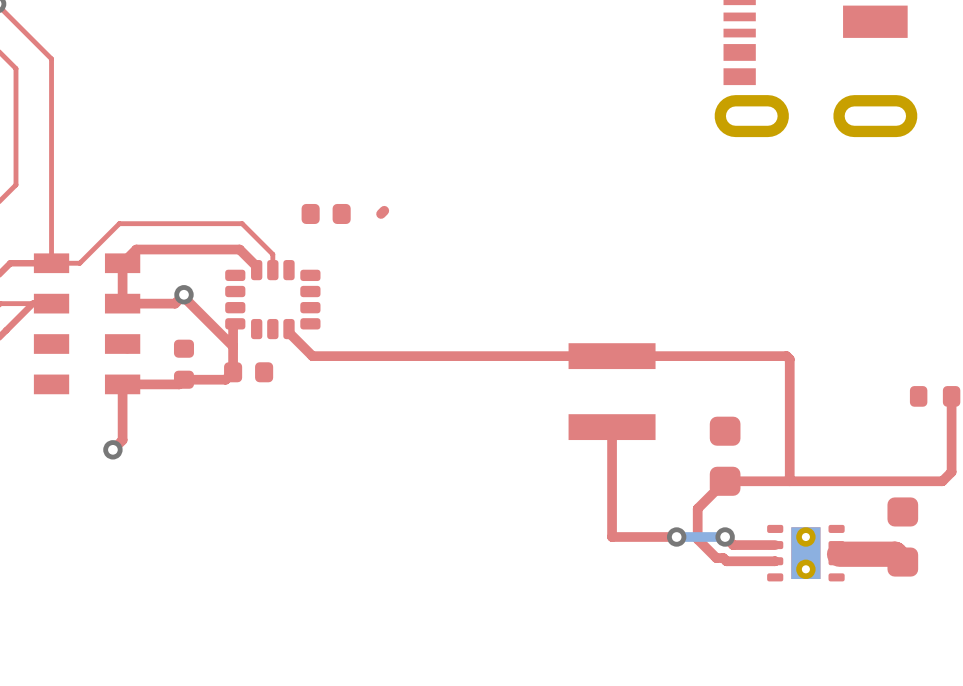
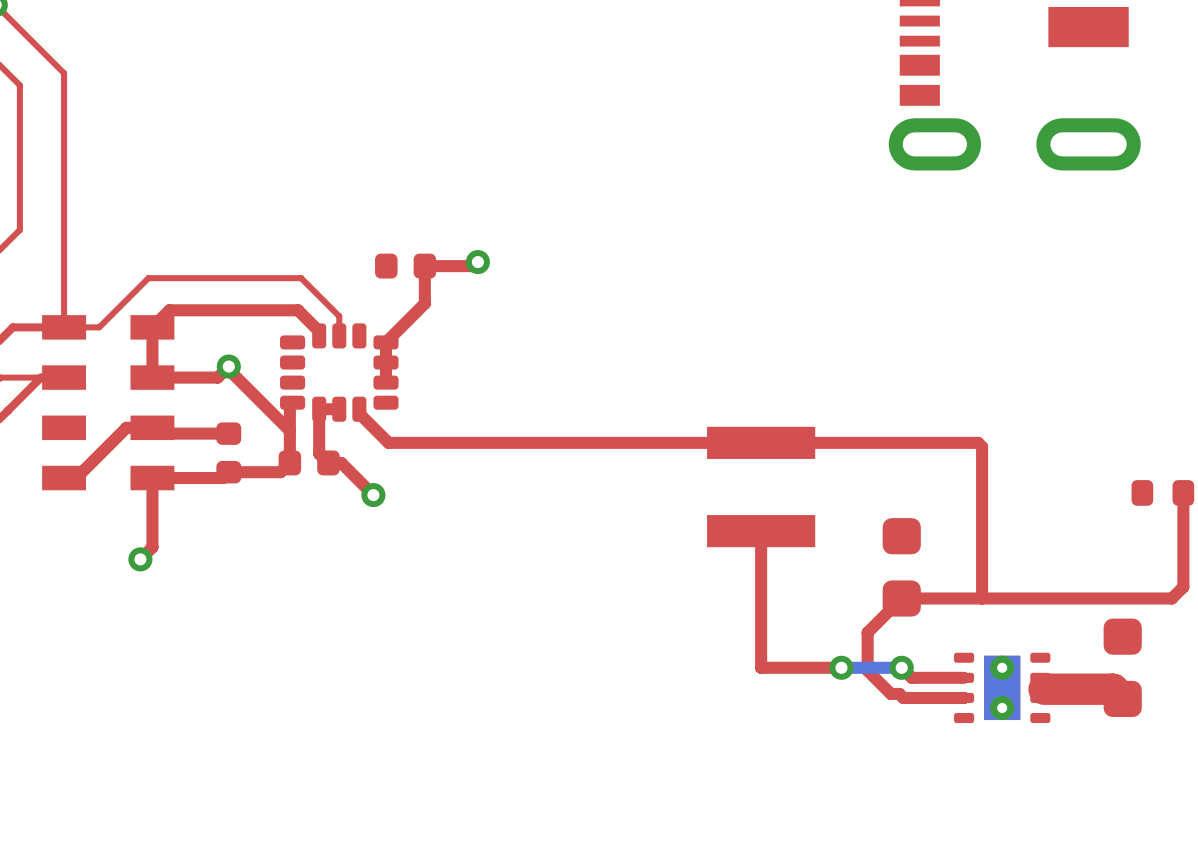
via: none -> (477, 262)
top track: none -> (473, 266) (424, 266) (424, 303) (385, 342) (385, 381)
top track: none -> (338, 409) (319, 409) (319, 453) (328, 462) (341, 462) (373, 495)
top track: none -> (152, 427) (126, 427) (76, 478)
top track: none -> (228, 433) (158, 433)
via: none -> (373, 495)

